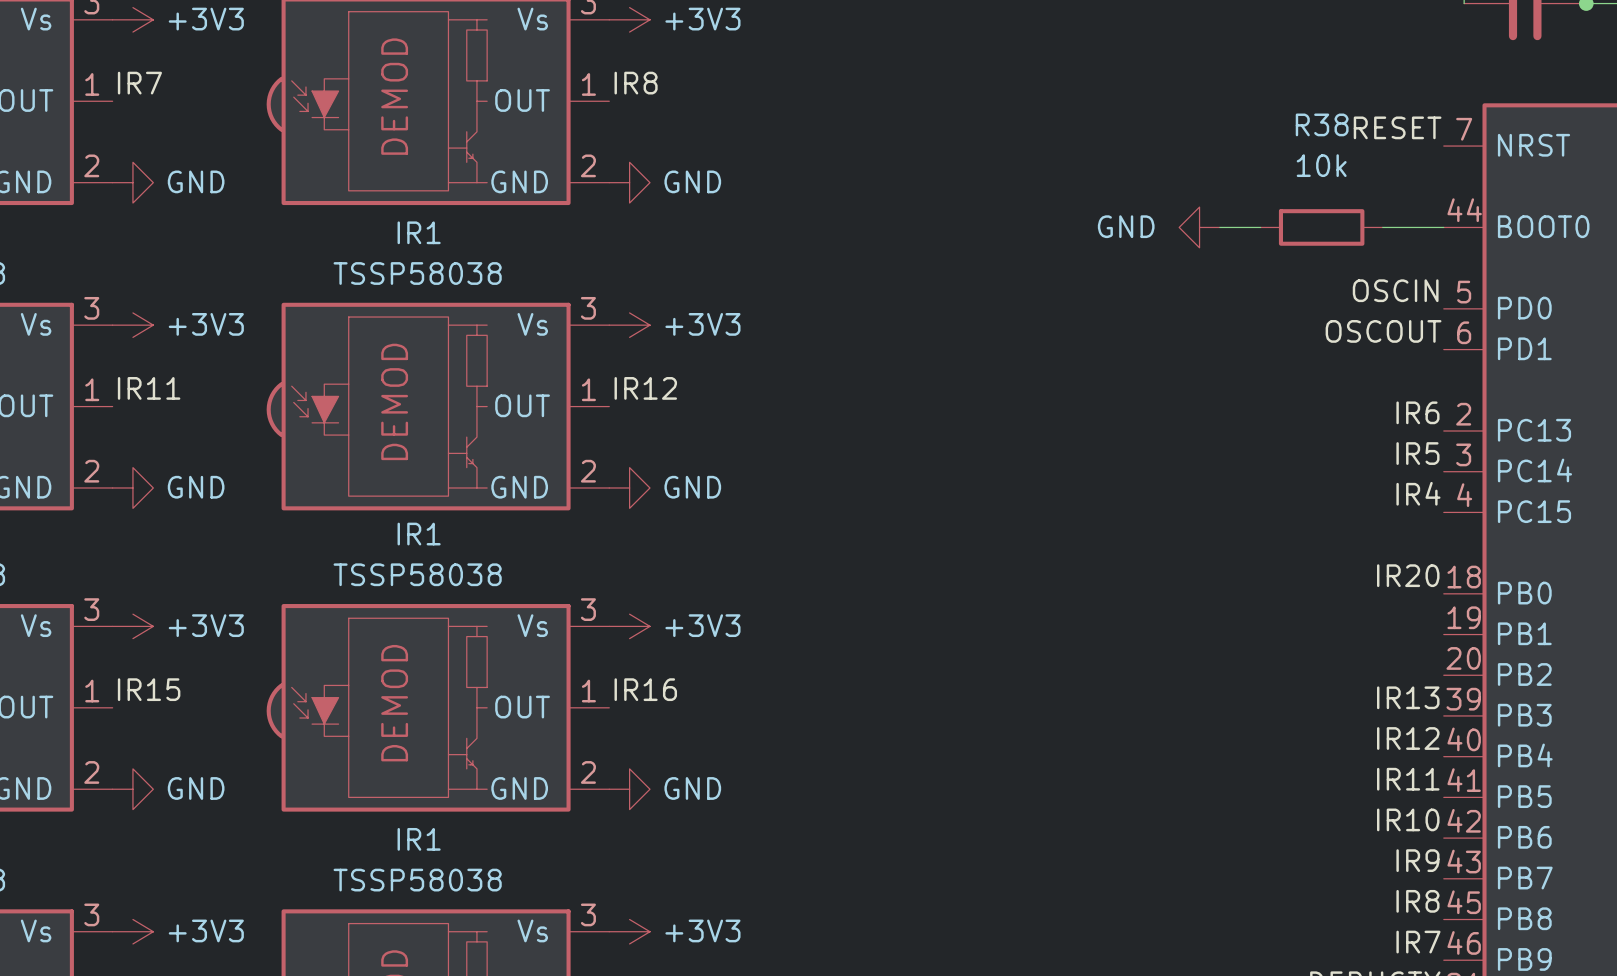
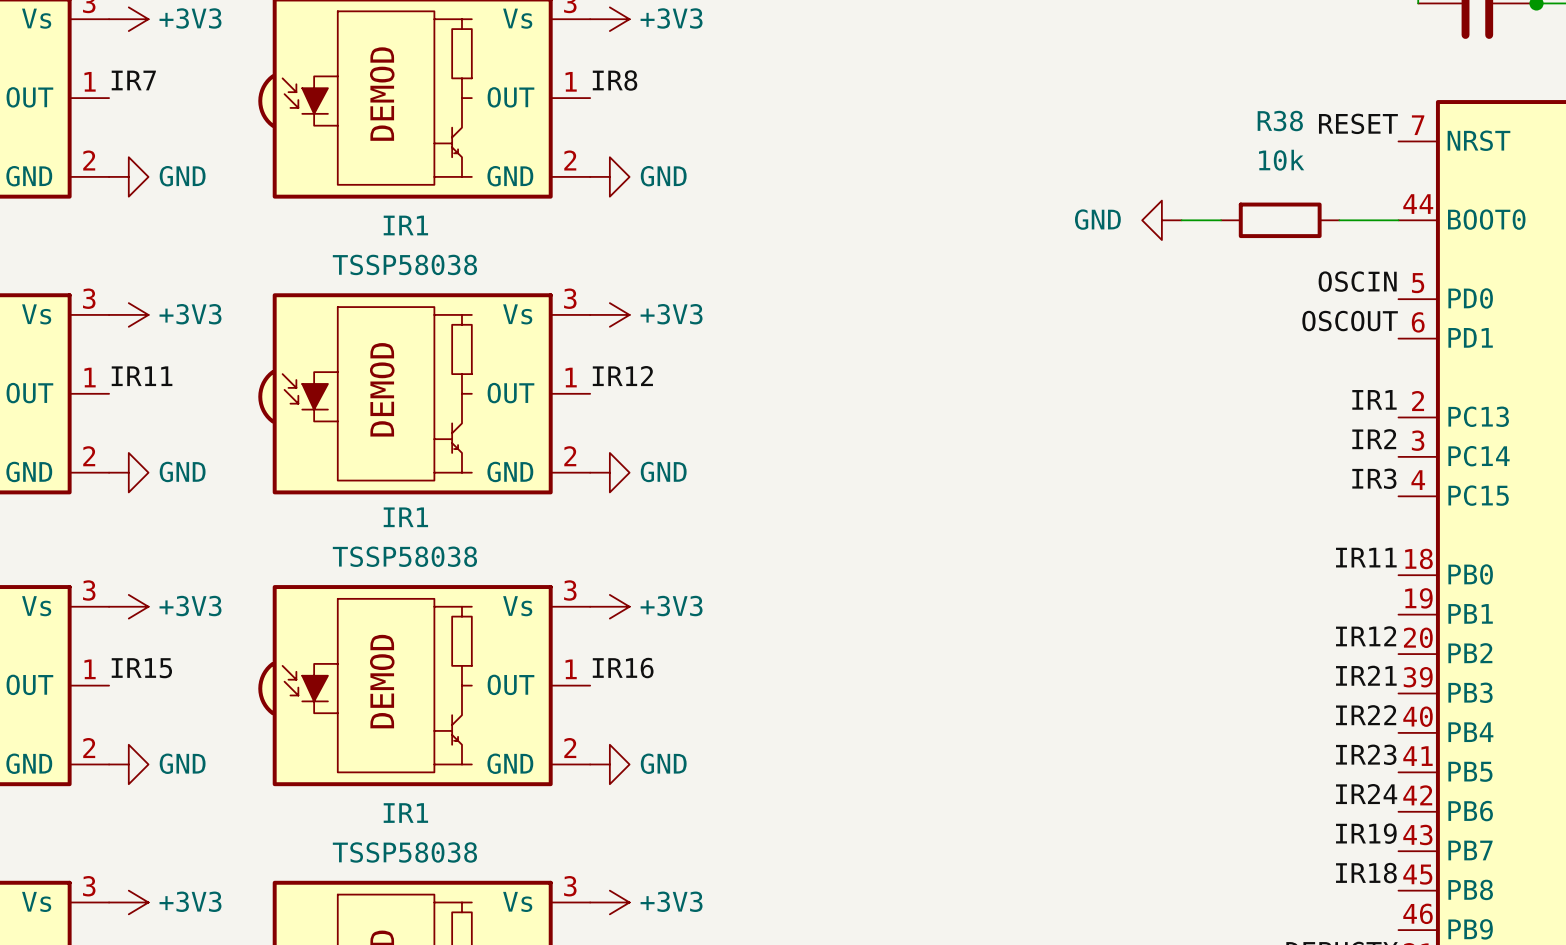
label: IR6 (1417, 412) -> IR1 (1374, 399)
label: IR5 (1417, 453) -> IR2 (1374, 439)
label: IR4 (1418, 493) -> IR3 (1374, 478)
label: IR20 (1408, 575) -> IR11 (1366, 557)
label: none -> IR12 (1366, 636)
label: IR13 (1408, 697) -> IR21 (1366, 675)
label: IR12 (1408, 738) -> IR22 (1366, 715)
label: IR11 (1408, 779) -> IR23 (1366, 754)
label: IR10 (1408, 819) -> IR24 (1366, 794)
label: IR9 (1417, 860) -> IR19 (1366, 833)
label: IR8 (1417, 901) -> IR18 (1366, 873)
label: IR7 (1418, 942) -> none

